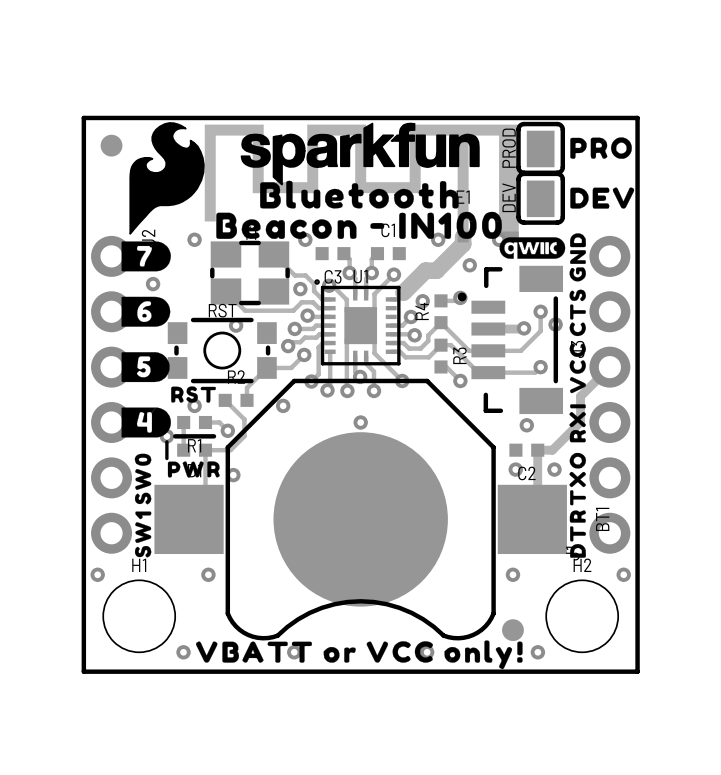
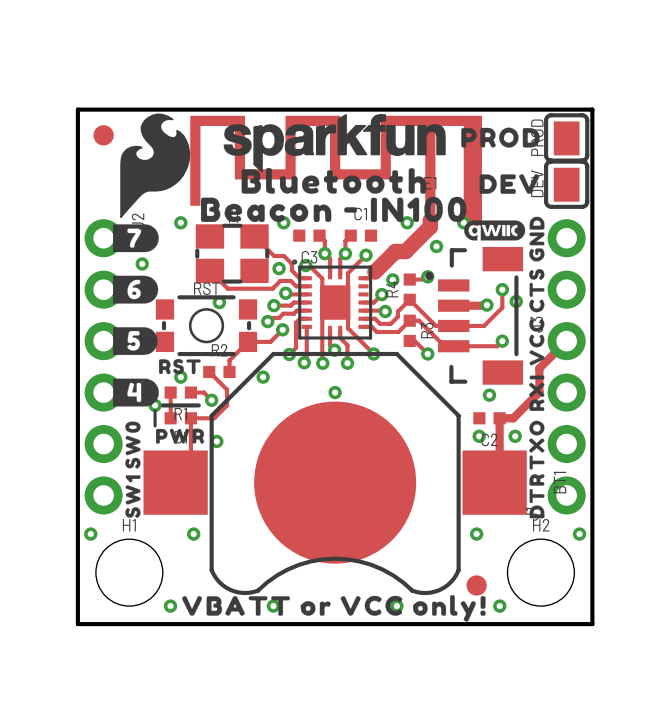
drawing: none -> [461, 127, 540, 148]
drawing: [570, 137, 632, 159] -> none
PROD position: (540, 148) -> (566, 137)
DEV position: (540, 198) -> (566, 184)
drawing position: (602, 198) -> (509, 184)
U1 name: U1 (360, 276) -> none

